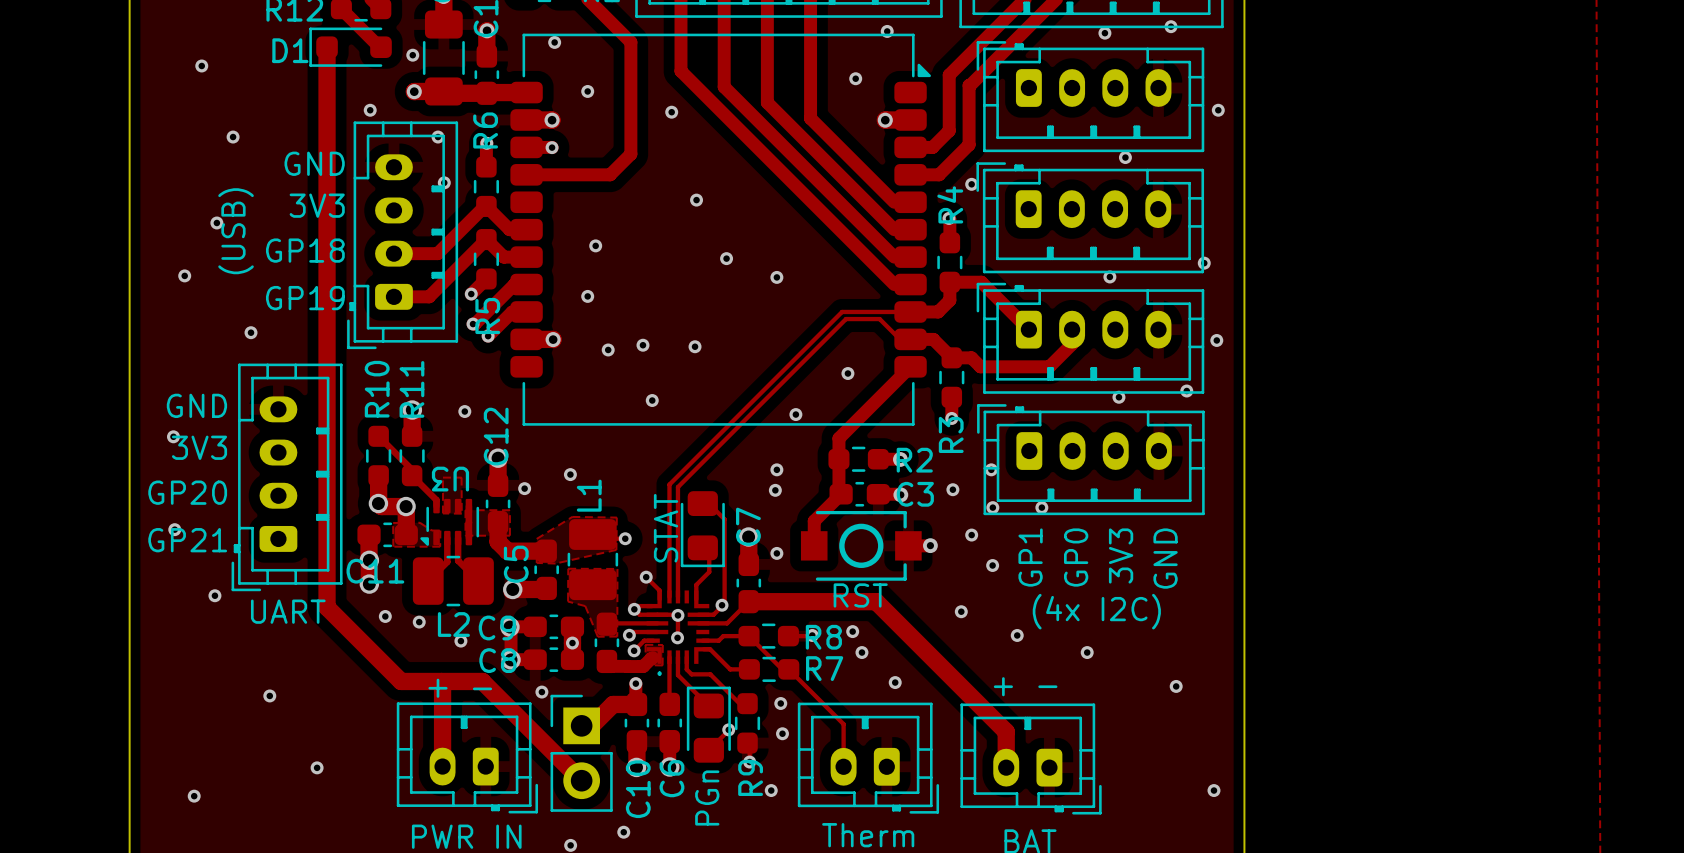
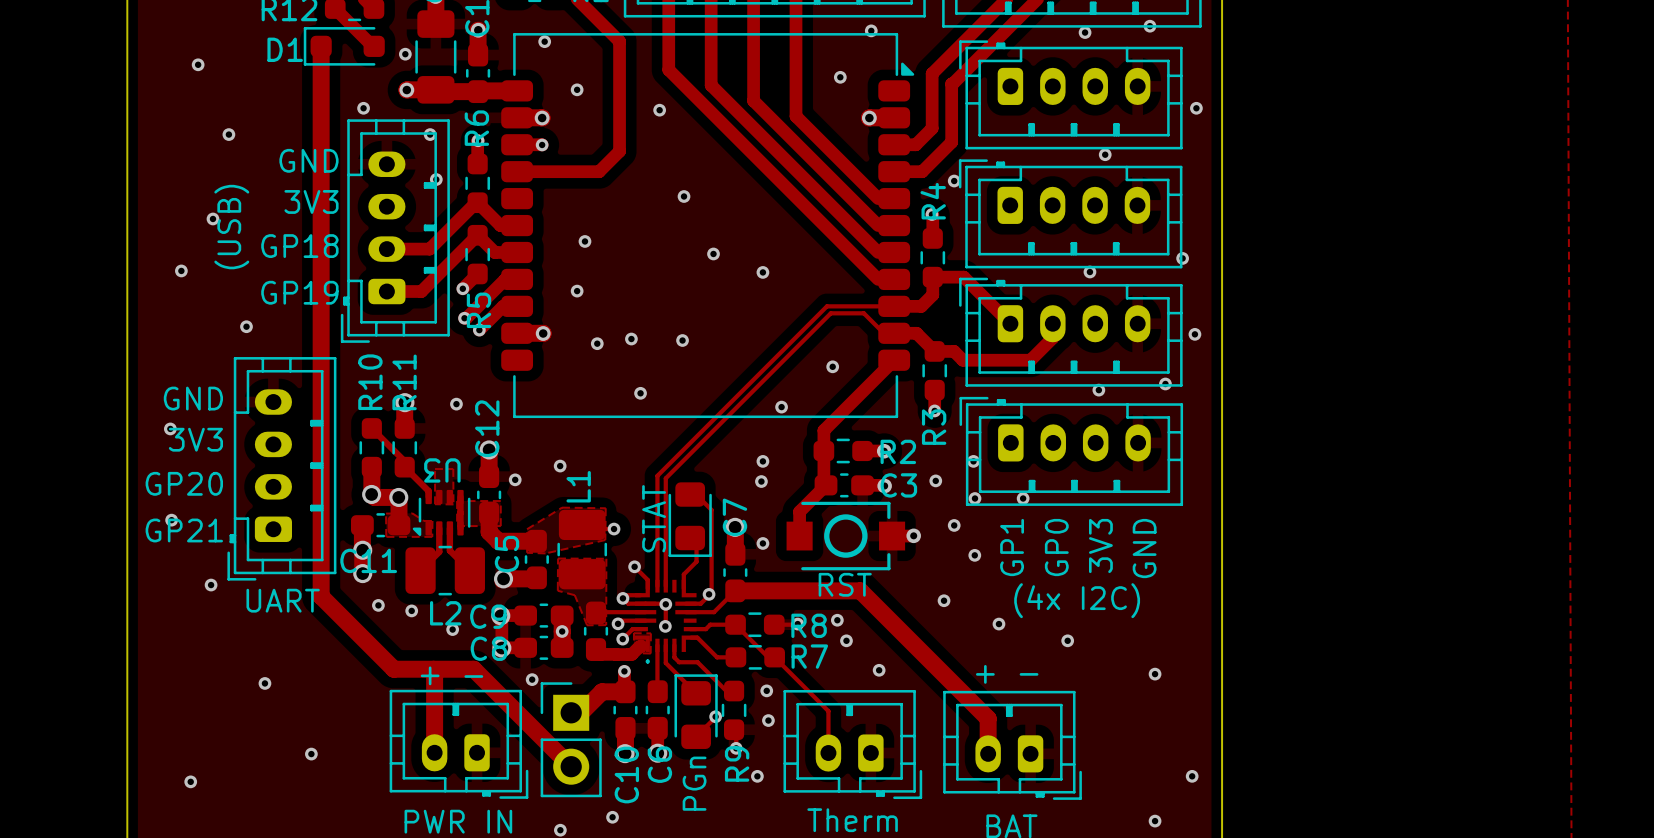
via: none -> (1155, 821)

